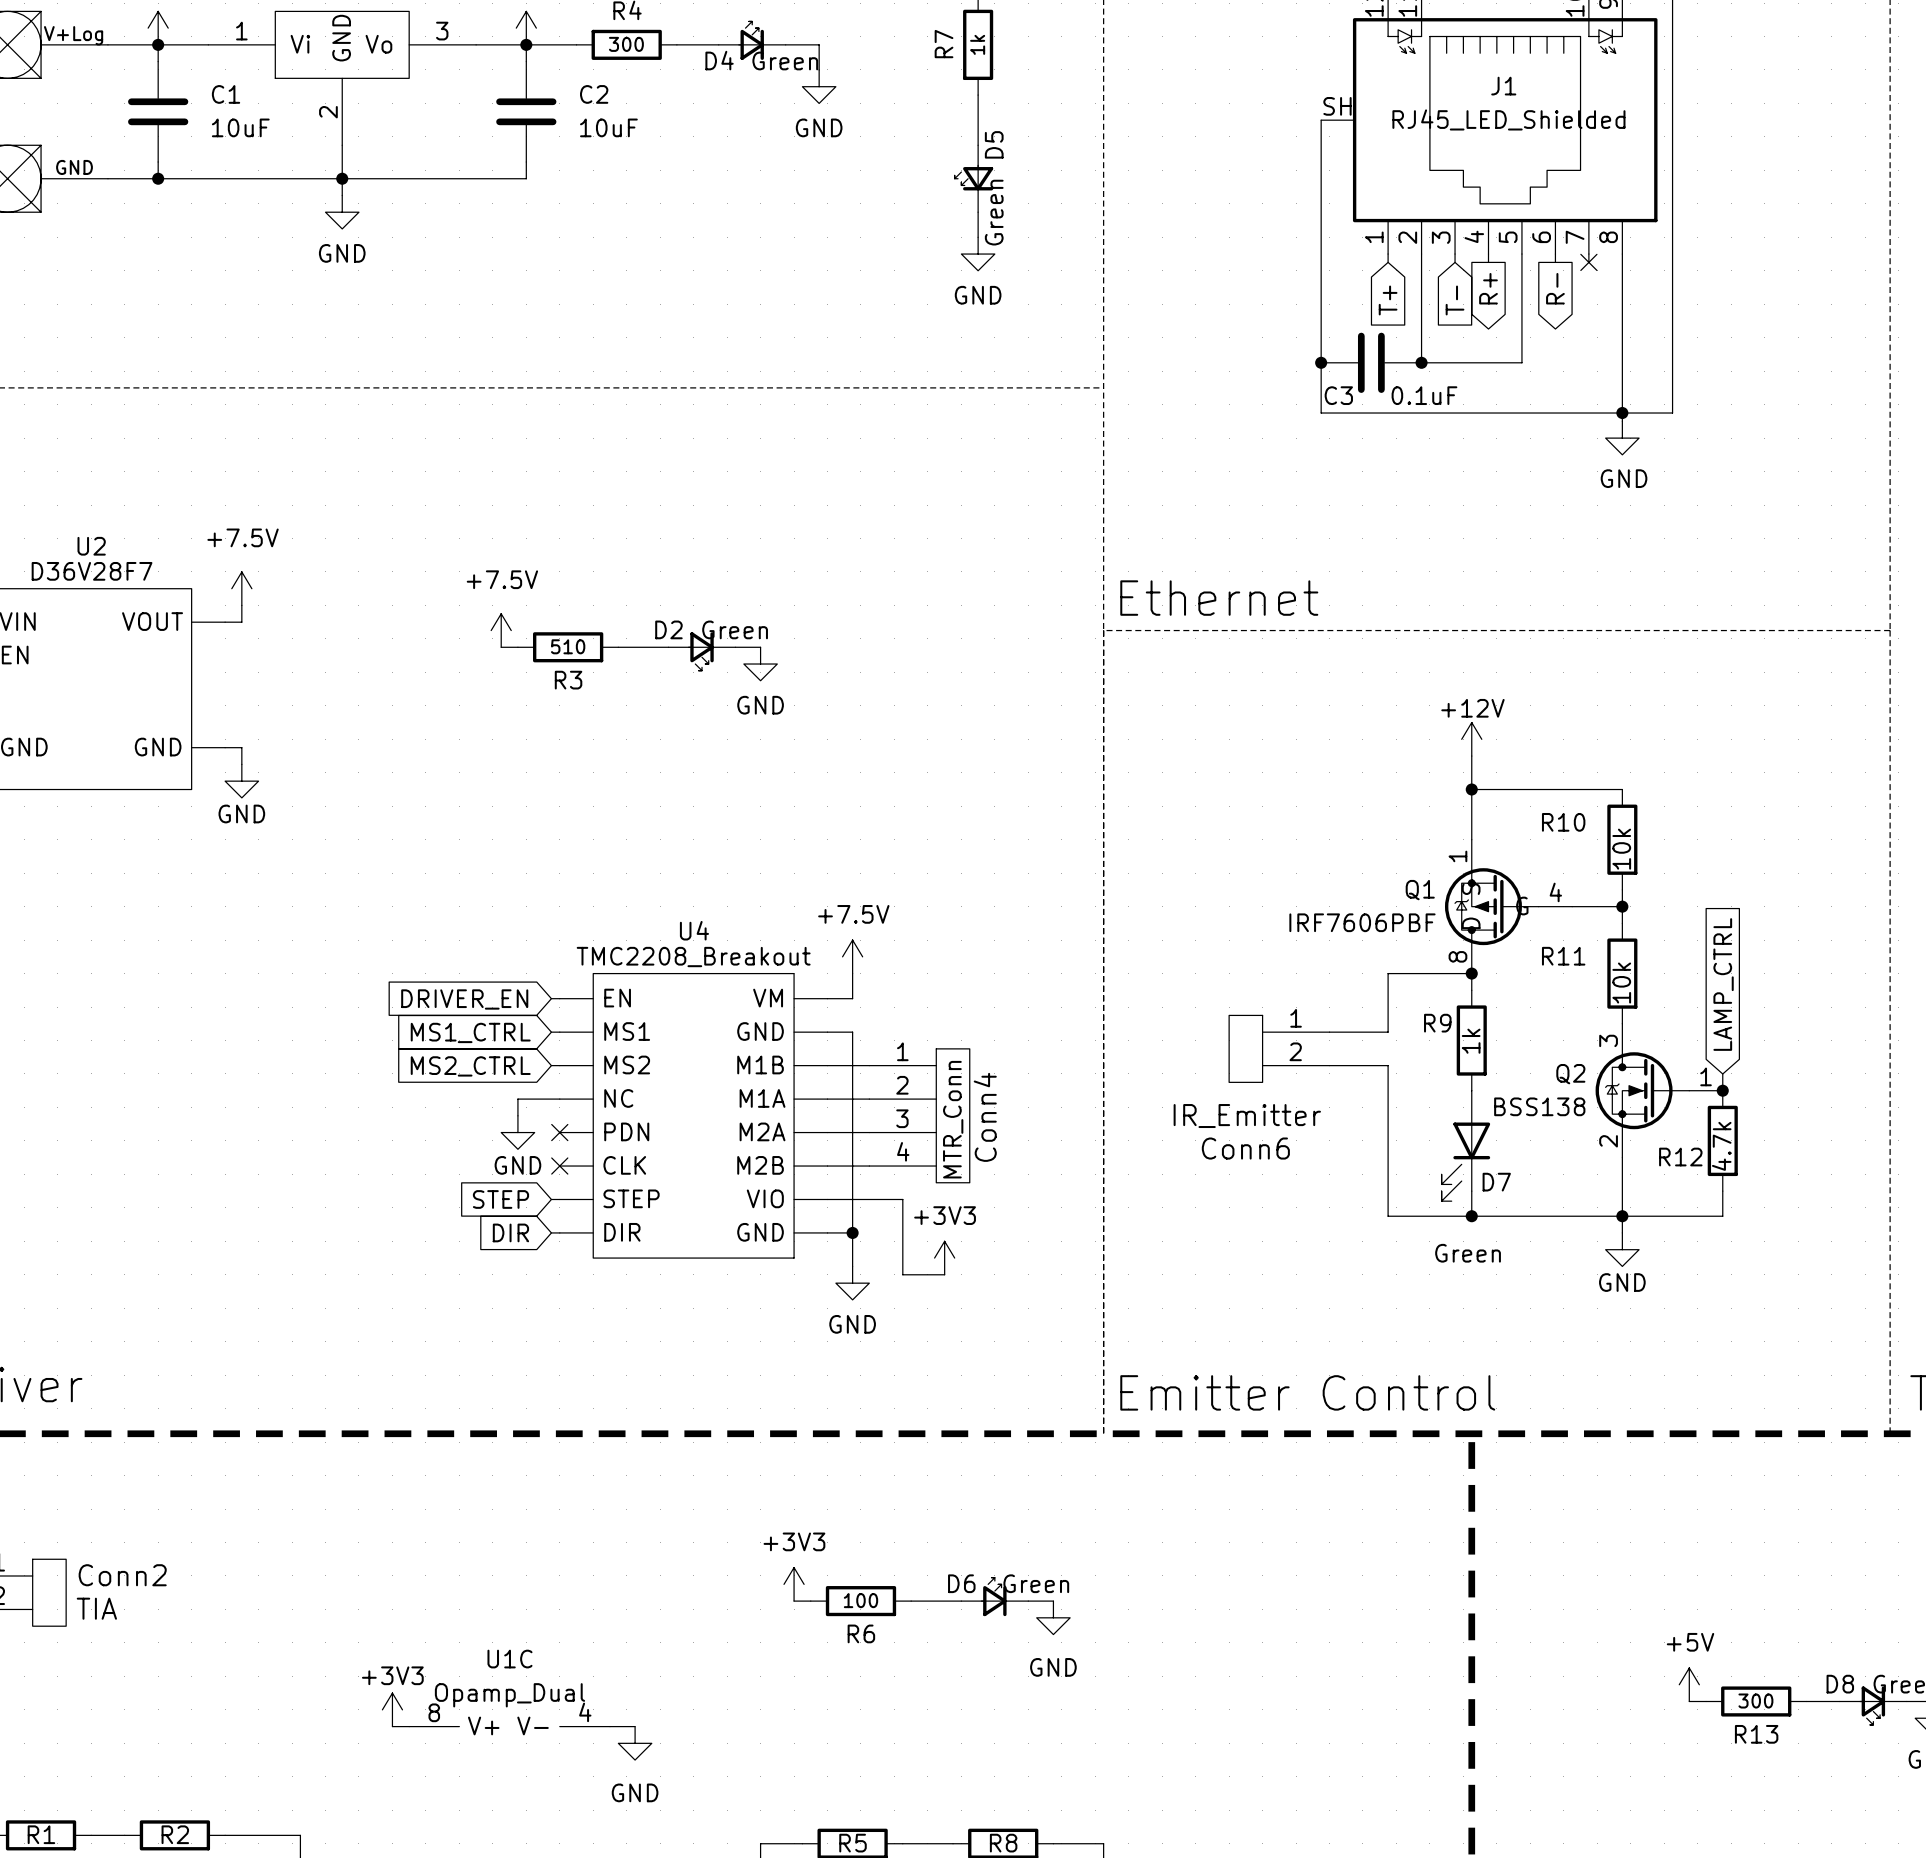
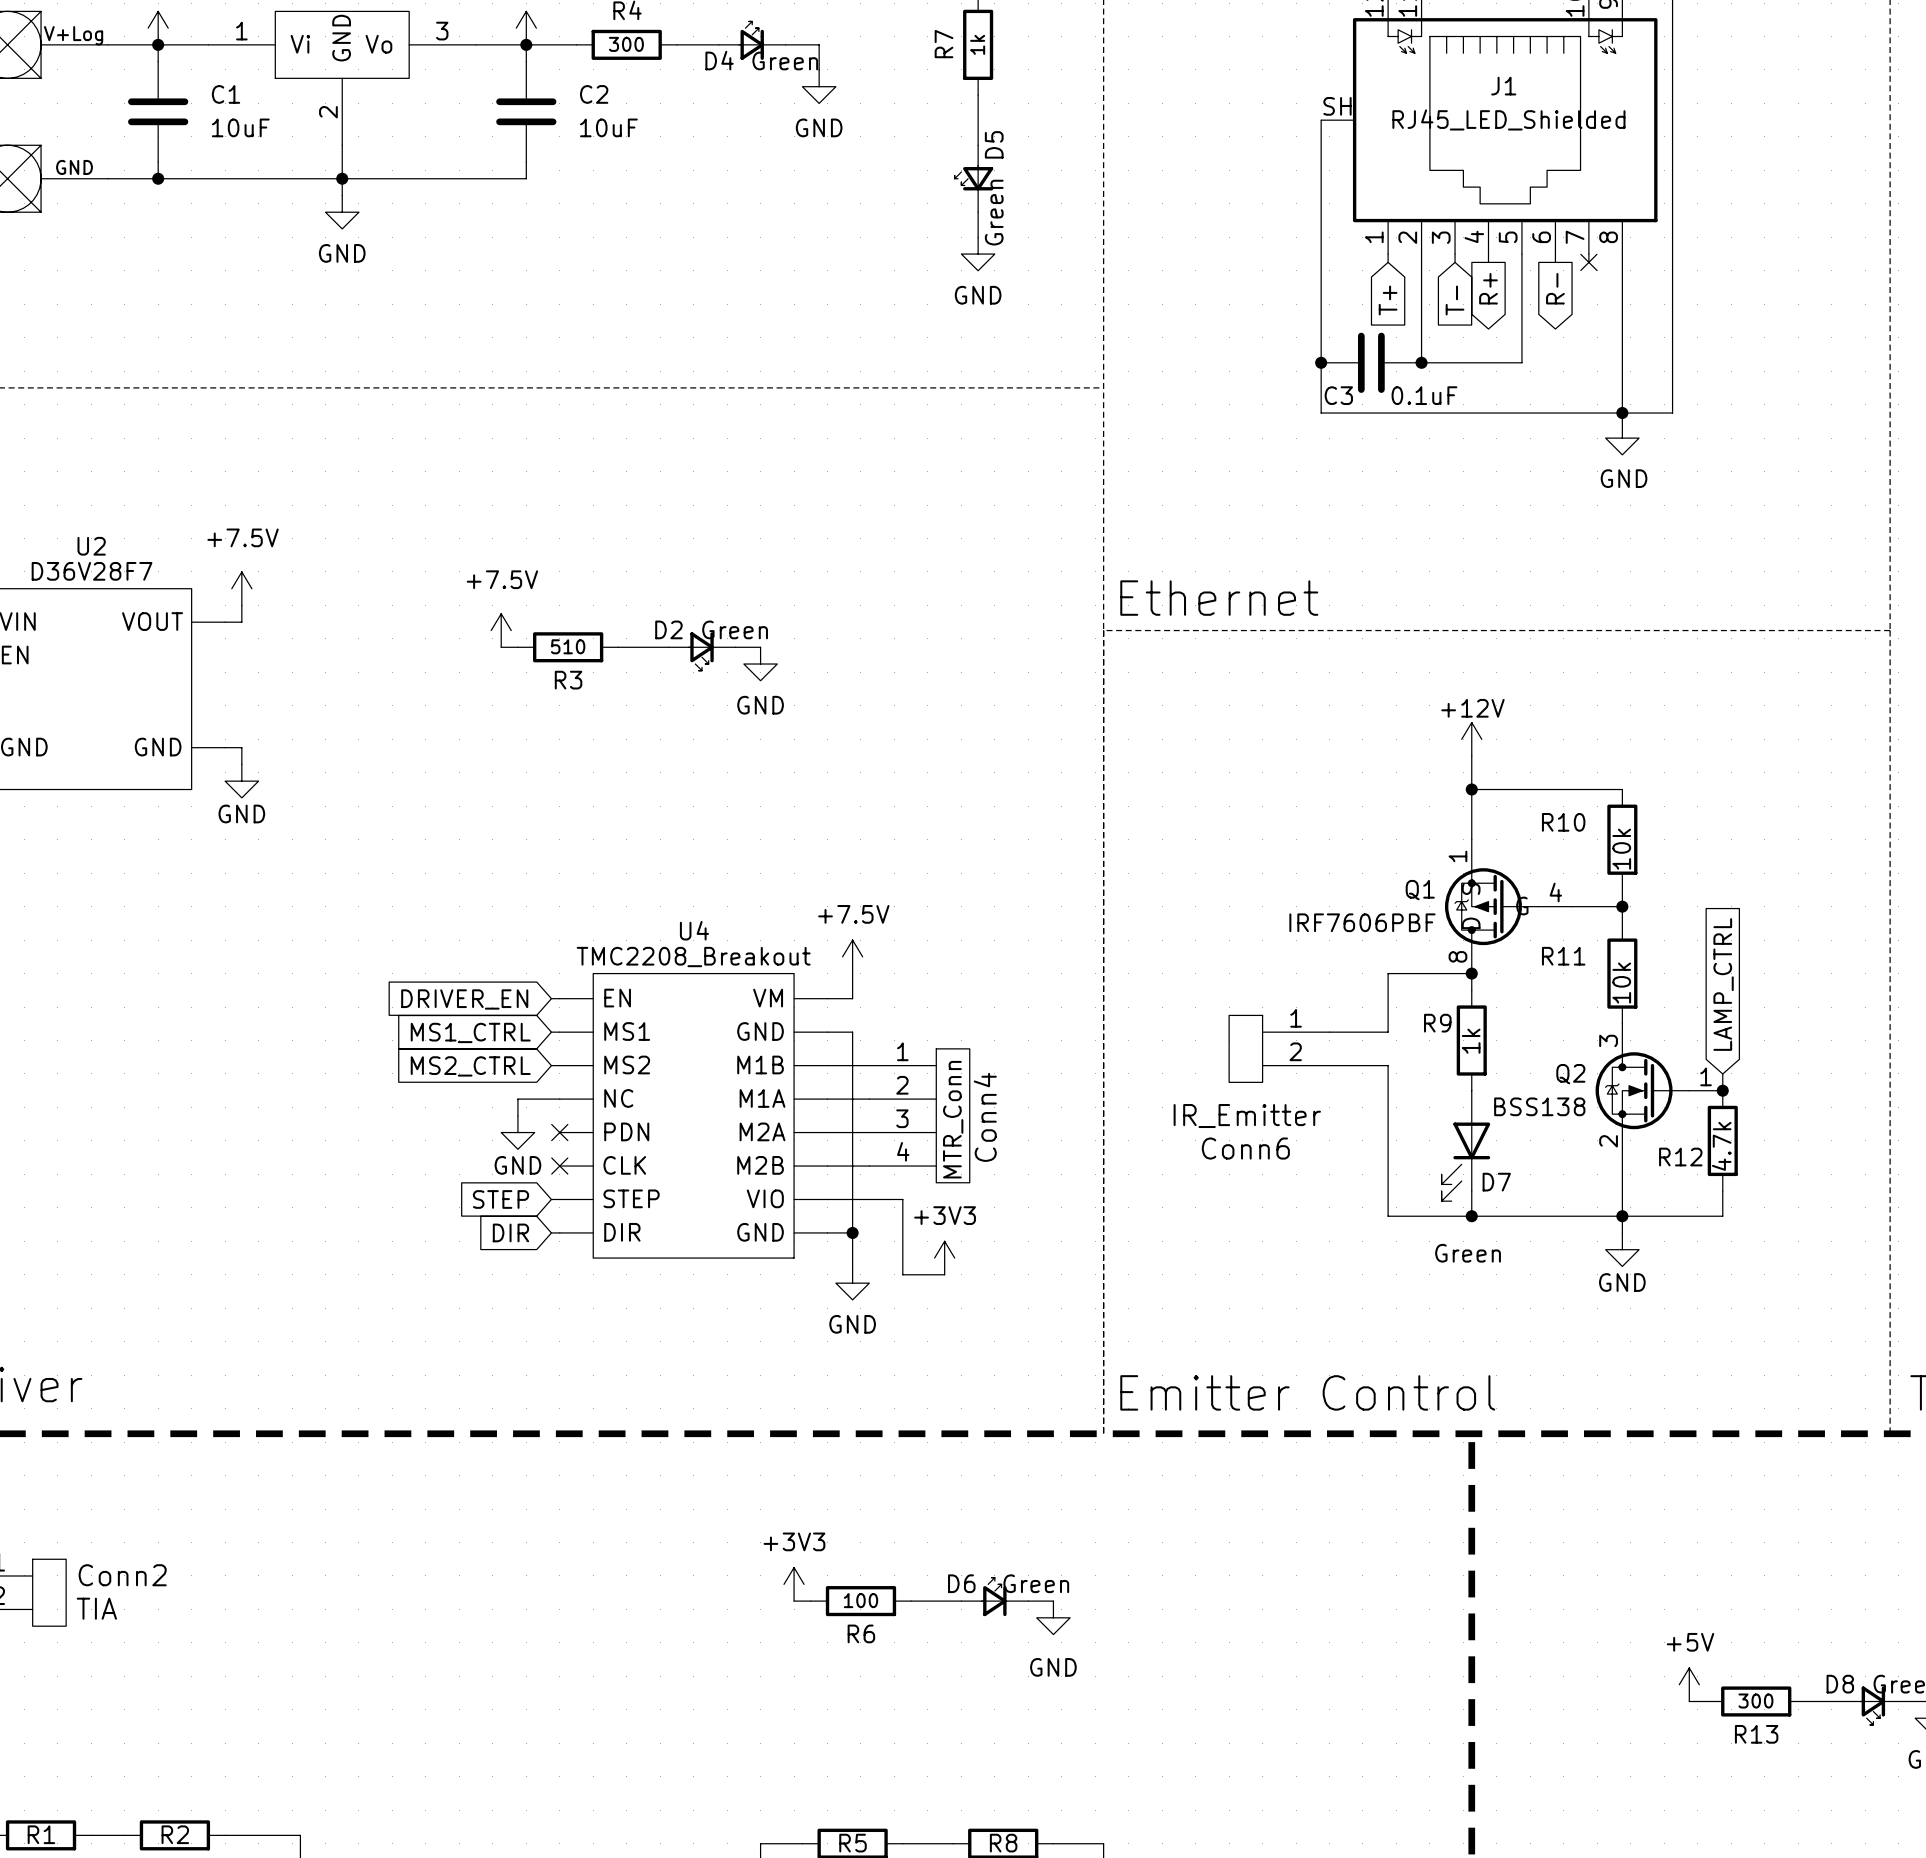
power symbol: +3V3 (392, 1709) -> none
wire: (392, 1726) (409, 1726) -> none
U1C: Opamp_Dual (509, 1726) -> none
wire: (609, 1726) (635, 1726) -> none
power symbol: GND (635, 1743) -> none

